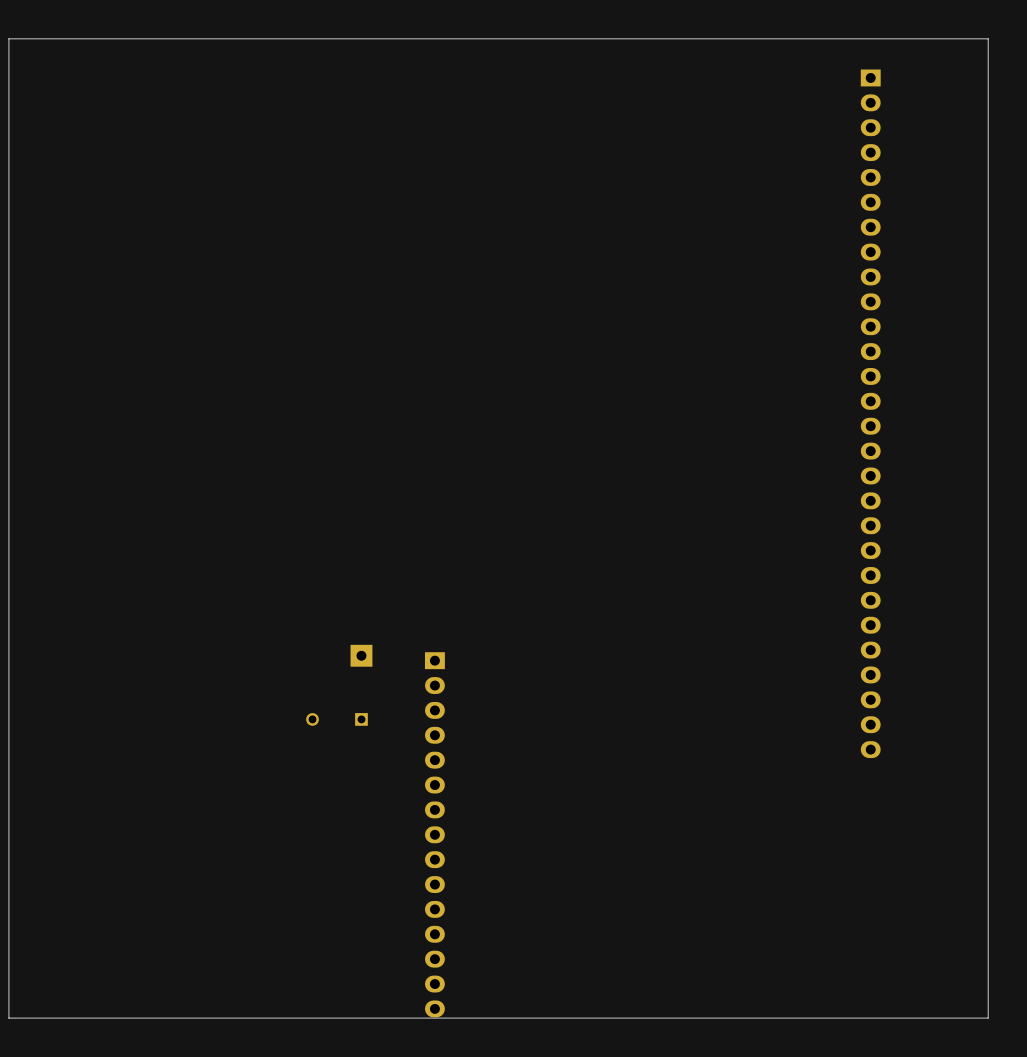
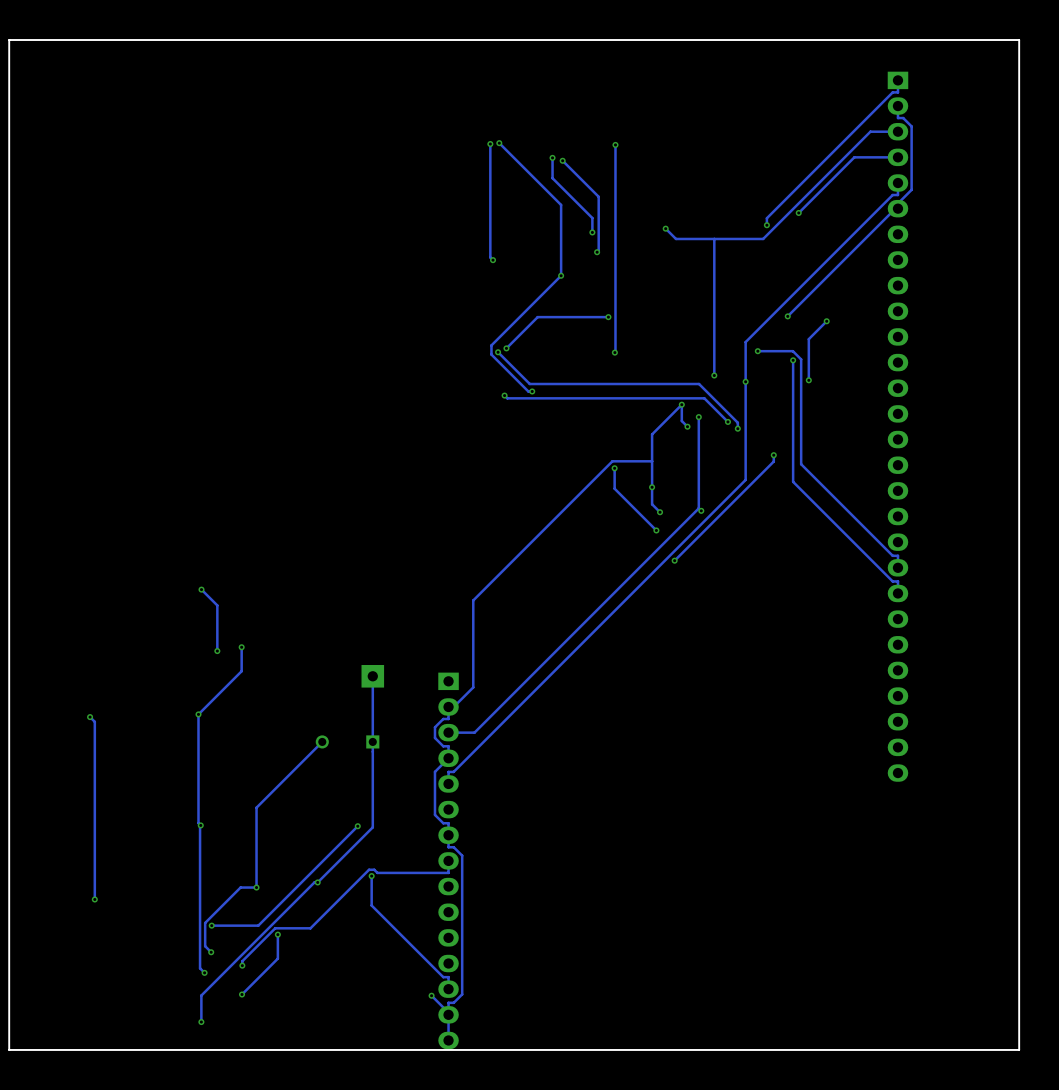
track: none -> (897, 80) (897, 92) (892, 92) (766, 218) (766, 225)
track: none -> (897, 106) (897, 118) (903, 118) (911, 126) (911, 189) (897, 203) (897, 208)
track: none -> (897, 131) (870, 131) (763, 238) (676, 238) (665, 228)
track: none -> (499, 143) (561, 204) (561, 275) (491, 345) (491, 354) (528, 391) (532, 391)
via: none -> (499, 143)
track: none -> (490, 144) (490, 257) (493, 260)
via: none -> (490, 144)
track: none -> (615, 144) (614, 352)
via: none -> (615, 144)
track: none -> (897, 157) (854, 157) (798, 212)
track: none -> (552, 157) (552, 178) (592, 218) (592, 232)
via: none -> (552, 157)
track: none -> (562, 160) (598, 196) (598, 250) (597, 252)
via: none -> (562, 160)
track: none -> (897, 183) (897, 195) (892, 195) (745, 342) (745, 479) (453, 771) (448, 771) (448, 783)
track: none -> (897, 206) (787, 316)
via: none -> (798, 212)
via: none -> (766, 225)
via: none -> (665, 228)
via: none -> (592, 232)
track: none -> (714, 238) (714, 375)
via: none -> (597, 252)
via: none -> (493, 260)
via: none -> (561, 275)
via: none -> (787, 316)
track: none -> (608, 317) (537, 317) (506, 348)
via: none -> (608, 317)
track: none -> (826, 321) (808, 339) (808, 380)
via: none -> (826, 321)
via: none -> (506, 348)
track: none -> (757, 351) (792, 351) (801, 359) (801, 464) (892, 555) (897, 555) (897, 567)
via: none -> (757, 351)
track: none -> (498, 352) (529, 384) (699, 384) (737, 422) (737, 428)
via: none -> (498, 352)
via: none -> (614, 352)
track: none -> (793, 360) (793, 481) (892, 581) (897, 581) (897, 593)
via: none -> (793, 360)
via: none -> (714, 375)
via: none -> (808, 380)
via: none -> (745, 381)
via: none -> (532, 391)
track: none -> (504, 395) (507, 398) (704, 398) (727, 421)
via: none -> (504, 395)
via: none -> (681, 404)
track: none -> (698, 417) (698, 508)
via: none -> (698, 417)
via: none -> (727, 421)
track: none -> (687, 426) (681, 421) (681, 404) (652, 434) (652, 504) (660, 512)
via: none -> (687, 426)
via: none -> (737, 428)
track: none -> (773, 455) (773, 461) (674, 560)
via: none -> (773, 455)
track: none -> (652, 461) (612, 461) (473, 600) (473, 687) (448, 712)
track: none -> (614, 468) (614, 488) (656, 530)
via: none -> (614, 468)
via: none -> (652, 487)
track: none -> (698, 508) (474, 732) (448, 732)
via: none -> (701, 510)
via: none -> (660, 512)
via: none -> (656, 530)
via: none -> (674, 560)
track: none -> (201, 589) (217, 605) (217, 651)
via: none -> (201, 589)
track: none -> (241, 647) (241, 671) (198, 714) (198, 823) (200, 825) (200, 968) (204, 972)
via: none -> (241, 647)
via: none -> (217, 651)
track: none -> (372, 676) (372, 827) (317, 882) (314, 882) (201, 995) (201, 1022)
track: none -> (448, 706) (448, 718) (443, 718) (434, 727) (434, 737) (443, 746) (448, 746) (448, 758) (434, 771) (434, 814) (443, 823) (448, 823) (448, 847) (453, 847) (462, 855) (462, 994) (453, 1002) (448, 1002) (448, 1040)
via: none -> (198, 714)
track: none -> (90, 717) (94, 721) (94, 899)
via: none -> (90, 717)
track: none -> (322, 741) (256, 807) (256, 887) (240, 887) (205, 922) (205, 946) (211, 952)
via: none -> (200, 825)
track: none -> (357, 826) (258, 925) (211, 925)
via: none -> (357, 826)
track: none -> (448, 860) (448, 872) (377, 872) (374, 869) (369, 869) (310, 928) (275, 928) (242, 961) (242, 965)
track: none -> (371, 876) (371, 905) (443, 977) (448, 977) (448, 989)
via: none -> (371, 876)
via: none -> (317, 882)
via: none -> (256, 887)
via: none -> (94, 899)
via: none -> (211, 925)
track: none -> (277, 934) (277, 958) (242, 994)
via: none -> (277, 934)
via: none -> (211, 952)
via: none -> (242, 965)
via: none -> (204, 972)
via: none -> (242, 994)
track: none -> (431, 995) (444, 1008) (448, 1008)
via: none -> (431, 995)
via: none -> (201, 1022)

